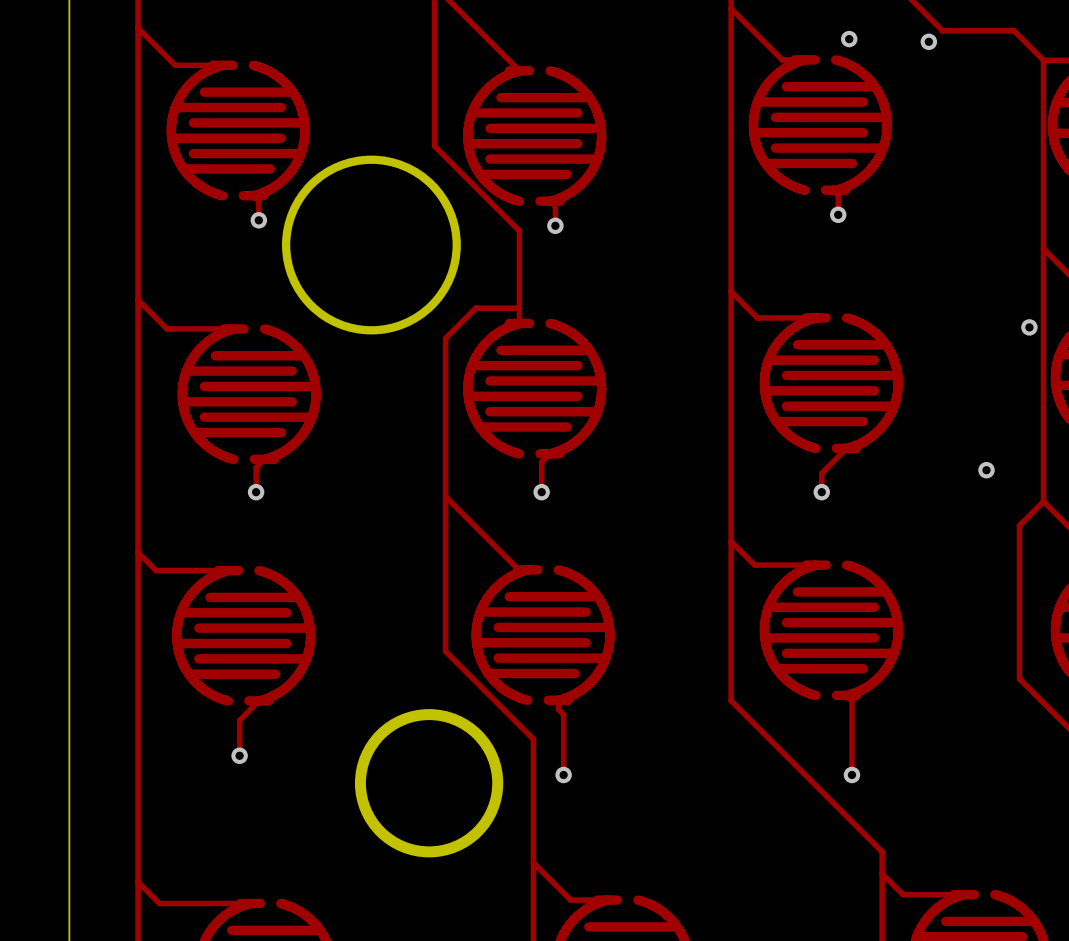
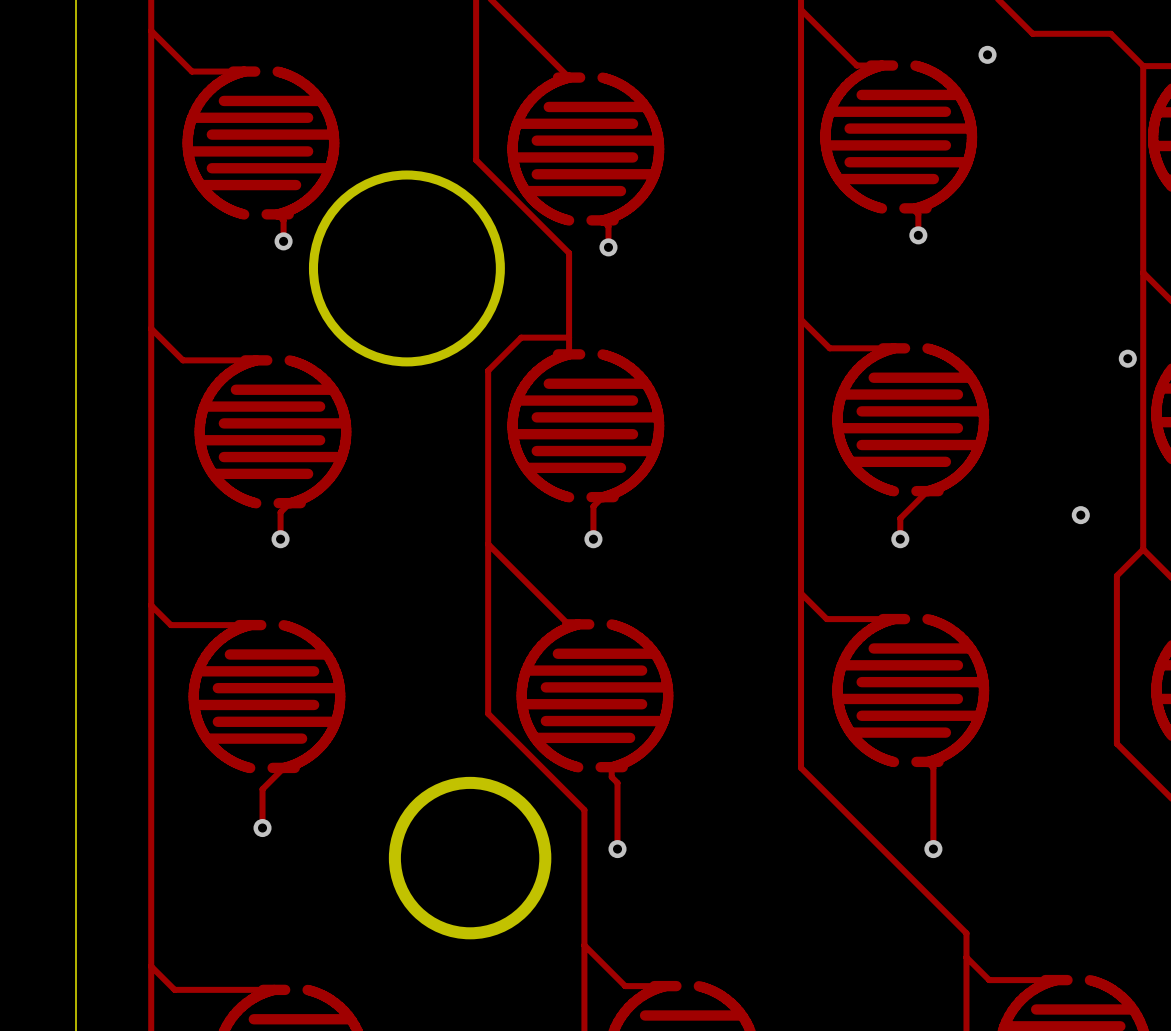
via: (849, 39) -> none
via: (928, 41) -> none
via: none -> (987, 54)

